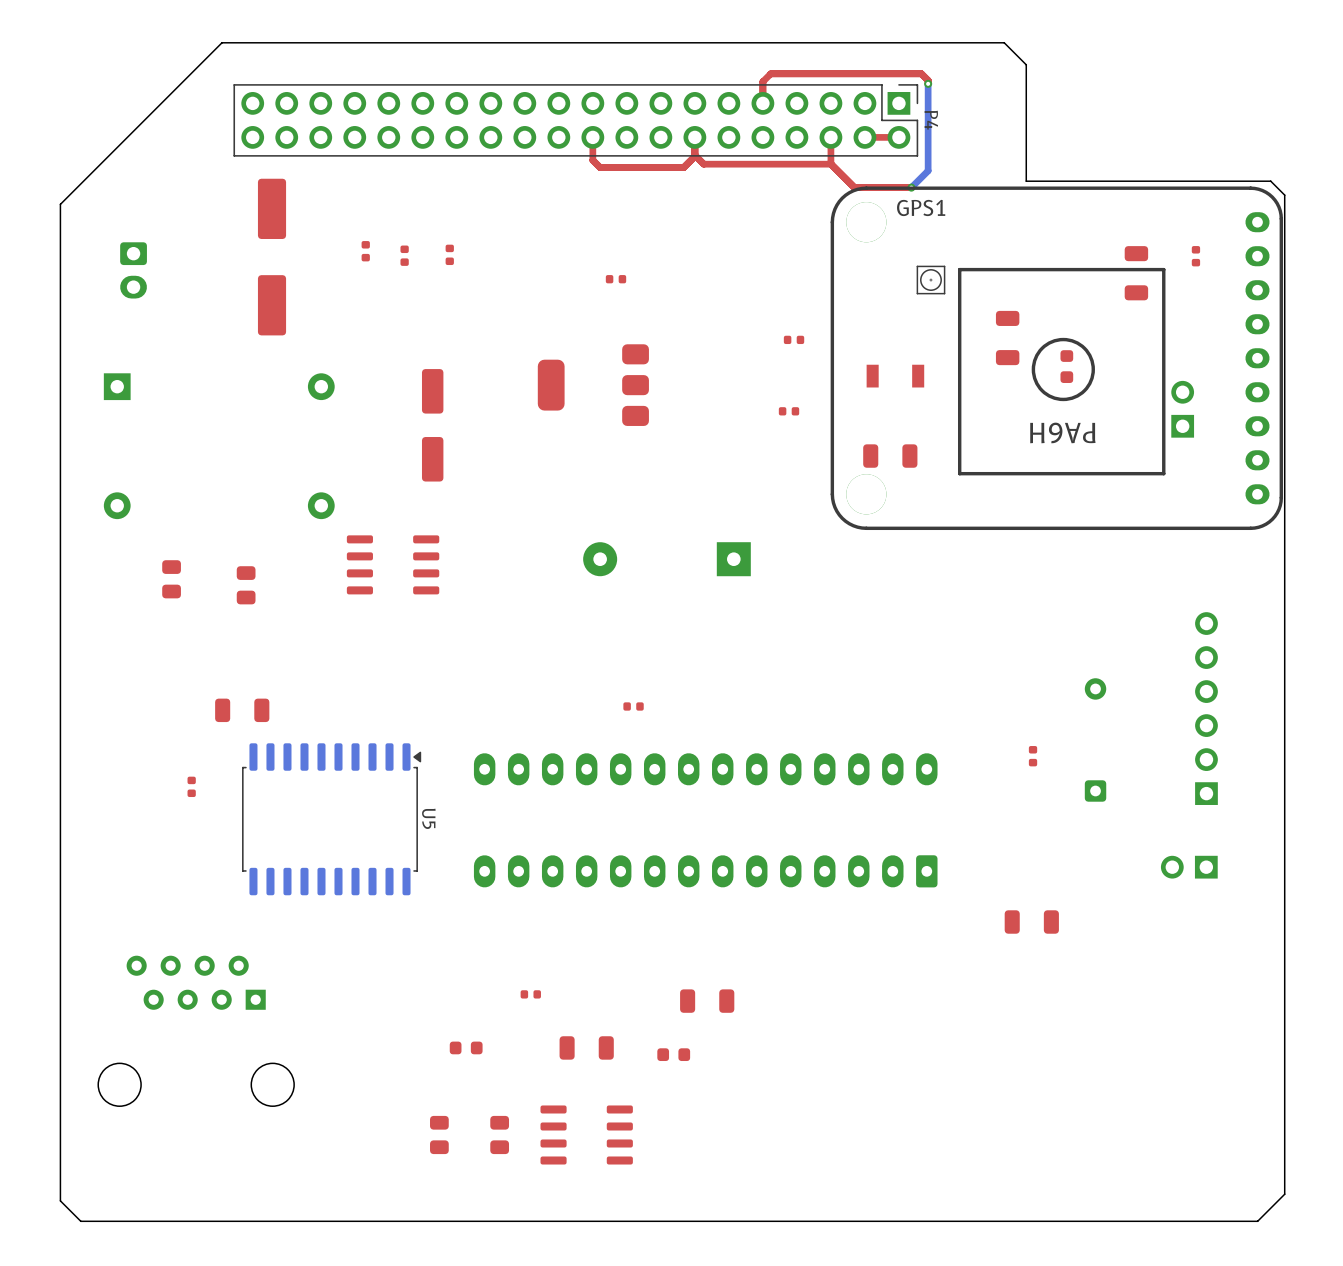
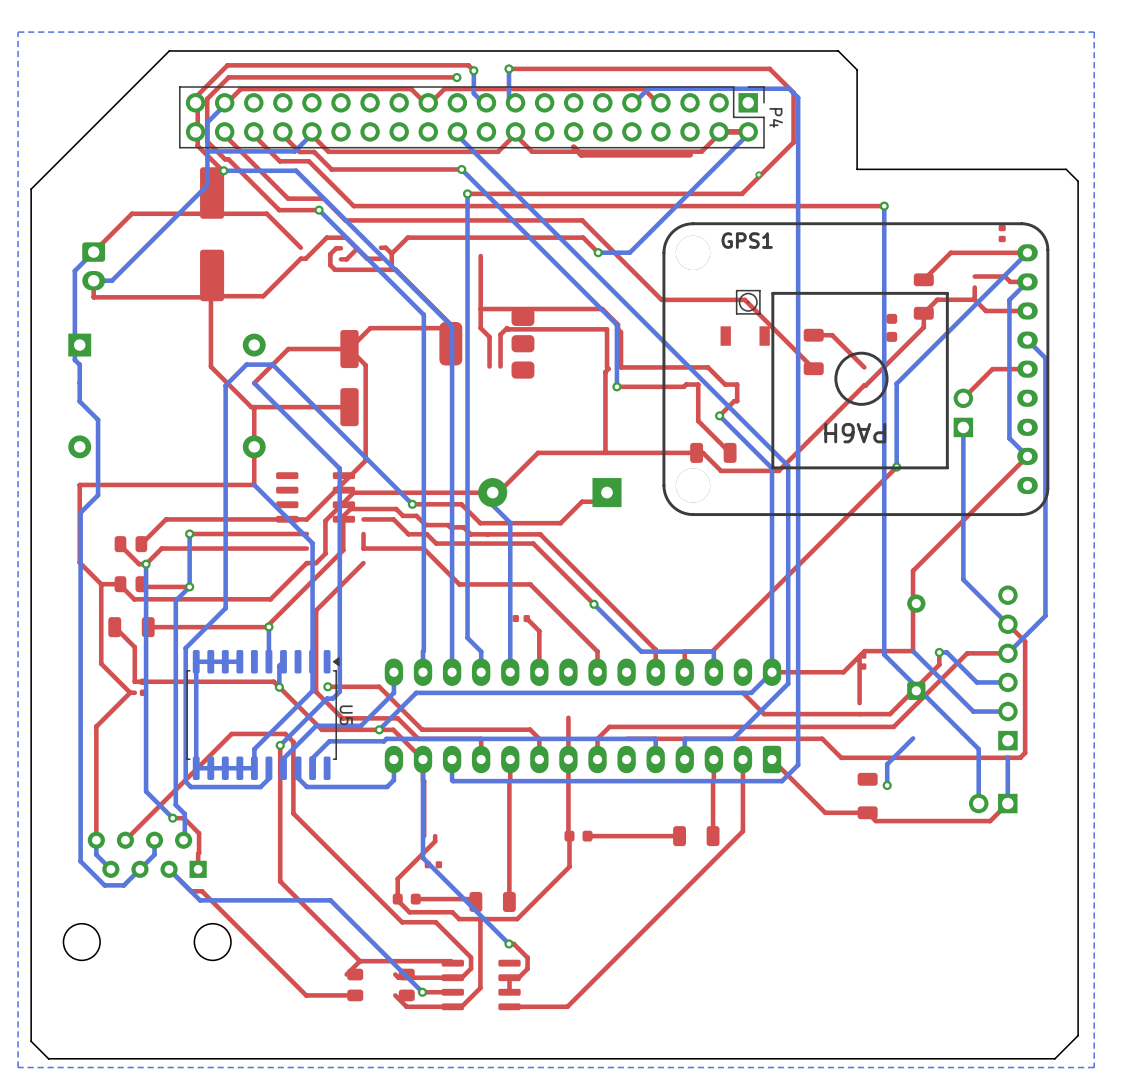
bottom zone outline: none -> (1094, 32) (18, 32) (18, 1067) (1094, 1067) (1094, 32)
top track: none -> (508, 68) (769, 68) (793, 92) (793, 142) (742, 193) (467, 193)
bottom track: none -> (508, 68) (508, 99) (515, 105)
via: none -> (508, 68)
top track: none -> (473, 70) (468, 65) (227, 65) (197, 95) (197, 145) (223, 170)
bottom track: none -> (473, 70) (473, 93) (485, 105)
via: none -> (473, 70)
top track: none -> (456, 77) (228, 77) (207, 98) (207, 141) (225, 159) (228, 159) (279, 210) (319, 210)
via: none -> (456, 77)
top track: (928, 83) (928, 80) (921, 73) (770, 73) (762, 81) (762, 103) -> none
bottom track: (928, 83) (928, 170) (911, 187) -> none
via: (928, 83) -> none
bottom track: none -> (224, 105) (207, 122) (207, 185) (112, 280) (93, 280)
bottom track: none -> (631, 105) (648, 88) (789, 88) (798, 97) (798, 764) (781, 781) (453, 781) (452, 759)
top track: none -> (660, 105) (643, 89) (444, 89) (427, 105) (411, 89) (240, 89) (224, 105)
top track: (694, 137) (694, 156) (683, 167) (600, 167) (592, 160) (592, 137) -> none
top track: (830, 137) (830, 164) (854, 187) (911, 187) -> none
top track: none -> (224, 134) (288, 198) (323, 198) (345, 220) (582, 220) (661, 299) (744, 299) (813, 368)
top track: none -> (253, 134) (279, 161) (308, 161) (353, 206) (884, 206)
top track: none -> (282, 134) (299, 151) (314, 151) (331, 169) (461, 169)
bottom track: none -> (311, 134) (294, 151) (207, 151)
bottom track: none -> (456, 134) (788, 466) (788, 683) (733, 738) (684, 738) (684, 759)
top track: none -> (718, 134) (701, 151) (532, 151) (515, 134) (498, 151) (328, 151) (311, 134)
bottom track: none -> (747, 134) (629, 252) (598, 252)
bottom track: none -> (461, 169) (616, 324) (616, 386)
via: none -> (461, 169)
bottom track: none -> (223, 170) (296, 170) (452, 326) (452, 672)
via: none -> (223, 170)
bottom track: none -> (467, 193) (467, 637) (481, 651) (481, 672)
via: none -> (467, 193)
bottom track: none -> (884, 206) (884, 654) (978, 749) (978, 803)
via: none -> (884, 206)
bottom track: none -> (319, 210) (423, 314) (423, 672)
via: none -> (319, 210)
part: (365, 251) -> none
part: (449, 254) -> none
part: (404, 255) -> none
part position: (133, 270) -> (93, 266)
top track: none -> (300, 247) (266, 213) (131, 213) (93, 252)
top track: none -> (380, 247) (385, 247) (391, 253)
top track: none -> (340, 248) (336, 248) (330, 254) (330, 265) (334, 269) (396, 269) (454, 328) (370, 328) (349, 349)
part: (1136, 273) -> none
top track: none -> (357, 248) (346, 259) (340, 259)
bottom track: none -> (93, 252) (74, 270) (74, 359) (79, 364) (79, 401) (98, 419) (98, 495) (80, 512) (80, 861) (104, 885) (123, 885) (154, 854) (154, 840)
top track: none -> (598, 252) (583, 237) (407, 237) (391, 253)
via: none -> (598, 252)
top track: none -> (1027, 252) (950, 252) (923, 279)
bottom track: none -> (1027, 252) (896, 383) (896, 467)
top track: none -> (391, 253) (391, 269)
part: (616, 279) -> none
top track: none -> (480, 256) (480, 328) (489, 336) (489, 366)
top track: none -> (380, 258) (367, 258) (346, 237) (326, 237) (305, 258) (300, 258) (263, 296) (210, 297)
top track: none -> (974, 276) (1004, 276) (1010, 281) (1027, 281)
top track: none -> (93, 280) (93, 297) (210, 297)
bottom track: none -> (1027, 281) (1009, 299) (1009, 438) (1027, 456)
top track: none -> (974, 287) (974, 299)
part: none -> (923, 296)
top track: none -> (210, 297) (210, 366) (251, 407) (349, 407)
top track: none -> (974, 299) (985, 310) (1027, 310)
top track: none -> (974, 299) (937, 299) (923, 313) (923, 327) (778, 470) (721, 470) (703, 452) (538, 452) (489, 501) (480, 492) (353, 492) (325, 520) (325, 553) (316, 563) (306, 563) (270, 599) (134, 599) (120, 584) (101, 584)
part: (1007, 338) -> none
part: (794, 339) -> none
top track: none -> (480, 309) (602, 309) (618, 324) (618, 329) (621, 332) (621, 367) (708, 367) (725, 384) (737, 384) (737, 401) (734, 401) (719, 415)
GPS1 position: (1056, 358) -> (855, 369)
top track: none -> (813, 335) (832, 335) (864, 367)
bottom track: none -> (1027, 340) (1045, 358) (1045, 615) (1007, 653)
top track: none -> (349, 349) (288, 349) (254, 383)
top track: none -> (349, 349) (365, 365) (365, 460) (306, 519) (166, 519) (141, 544)
part: none -> (813, 351)
part position: (1182, 409) -> (963, 412)
top track: none -> (500, 366) (500, 334) (507, 328) (607, 329) (608, 368) (605, 371) (605, 452)
part: (789, 411) -> none
top track: none -> (1027, 369) (992, 369) (963, 398)
bottom track: none -> (254, 383) (339, 468) (339, 691) (332, 698) (326, 698) (280, 745)
top track: none -> (616, 386) (683, 386) (686, 384) (698, 384) (698, 421) (730, 452)
via: none -> (616, 386)
part: (890, 456) -> none
top track: none -> (254, 407) (254, 484) (79, 484) (79, 562) (101, 584)
bottom track: none -> (719, 415) (772, 468) (772, 672) (751, 692) (416, 692) (379, 729)
via: none -> (719, 415)
bottom track: none -> (963, 427) (963, 579) (1007, 624)
part: none -> (713, 452)
top track: none -> (1027, 456) (913, 570) (913, 651) (864, 651) (843, 672) (772, 672)
top track: none -> (896, 467) (712, 651) (684, 651) (684, 672)
via: none -> (896, 467)
bottom track: none -> (254, 484) (312, 543) (312, 690) (254, 749) (254, 768) (196, 768) (196, 661) (239, 661)
bottom track: none -> (489, 501) (510, 522) (510, 672)
top track: none -> (603, 501) (582, 501) (560, 523) (480, 523) (461, 504) (412, 504)
bottom track: none -> (412, 504) (272, 364) (246, 364) (225, 385) (225, 608) (185, 648) (185, 781) (191, 787) (260, 787) (268, 778) (268, 768)
via: none -> (412, 504)
part: (171, 579) -> none
part: (246, 585) -> none
top track: none -> (363, 519) (393, 519) (408, 534) (426, 534) (436, 543) (533, 543) (594, 604)
bottom track: none -> (189, 533) (189, 586) (175, 600) (175, 804) (184, 813) (183, 840)
via: none -> (189, 533)
top track: none -> (306, 533) (189, 533)
top track: none -> (363, 533) (363, 548) (423, 548) (459, 584) (530, 584) (597, 651) (597, 672)
top track: none -> (120, 544) (139, 564) (146, 564) (161, 548) (306, 548)
part: none -> (130, 544)
top track: none -> (363, 563) (316, 610) (316, 691) (342, 718) (397, 718) (418, 738) (481, 738) (481, 759)
bottom track: none -> (146, 564) (146, 791) (172, 818)
via: none -> (146, 564)
top track: none -> (101, 584) (101, 663) (130, 692)
part: none -> (130, 584)
top track: none -> (141, 584) (144, 586) (189, 586)
via: none -> (189, 586)
bottom track: none -> (594, 604) (641, 651) (713, 651) (713, 672)
via: none -> (594, 604)
top track: none -> (526, 618) (539, 631) (539, 672)
part position: (1206, 708) -> (1007, 667)
part position: (242, 710) -> (131, 627)
top track: none -> (1007, 624) (1025, 641) (1025, 752) (1020, 757) (841, 757) (822, 738) (626, 738)
top track: none -> (267, 625) (148, 627)
top track: none -> (267, 625) (343, 550) (343, 516) (350, 509) (396, 509) (403, 515) (416, 515) (425, 525) (463, 527) (470, 534) (540, 534) (655, 649) (655, 672)
top track: none -> (114, 627) (134, 647) (134, 681) (273, 681) (321, 729) (393, 729) (423, 759) (424, 836)
bottom track: none -> (268, 626) (268, 661)
via: none -> (268, 626)
bottom track: none -> (913, 651) (973, 711) (1007, 711)
top track: none -> (939, 652) (939, 664) (890, 714) (764, 714) (742, 692)
bottom track: none -> (939, 652) (946, 652) (976, 682) (1007, 682)
via: none -> (939, 652)
top track: none -> (1007, 653) (967, 653) (893, 726) (609, 726) (597, 738) (597, 759)
top track: none -> (859, 656) (859, 703)
bottom track: none -> (283, 661) (279, 665) (279, 687)
bottom track: none -> (393, 672) (393, 692) (360, 725) (316, 725) (283, 758) (283, 768)
via: none -> (279, 687)
top track: none -> (327, 686) (379, 686) (422, 729) (530, 729) (539, 738) (539, 759)
via: none -> (327, 686)
top track: none -> (130, 692) (96, 726) (96, 840)
top track: none -> (134, 692) (130, 692)
top track: none -> (568, 717) (569, 866) (517, 919) (459, 919) (452, 912) (409, 912) (397, 900) (397, 878) (435, 841) (435, 836)
via: none -> (379, 729)
bottom track: none -> (913, 738) (887, 764) (887, 785)
top track: none -> (280, 745) (280, 881) (359, 961)
via: none -> (280, 745)
part position: (1189, 867) -> (993, 803)
bottom track: none -> (1007, 757) (1007, 803)
bottom track: none -> (393, 759) (393, 780) (387, 786) (306, 786) (298, 778) (298, 768)
bottom track: none -> (423, 759) (423, 857) (508, 943)
top track: none -> (510, 759) (509, 901)
bottom track: none -> (655, 759) (655, 738) (386, 738) (384, 741) (329, 741) (312, 758) (312, 768)
top track: none -> (713, 759) (713, 836)
top track: none -> (742, 759) (742, 831) (567, 1006) (509, 1006)
top track: none -> (772, 759) (825, 812) (867, 812) (875, 821) (990, 821) (1007, 803)
via: none -> (887, 785)
part rotation: 0° (1031, 922) -> 90° clockwise (867, 796)
top track: none -> (172, 818) (183, 818) (199, 833) (198, 869)
via: none -> (172, 818)
part: none -> (578, 836)
top track: none -> (679, 836) (587, 836)
part: none -> (696, 836)
bottom track: none -> (96, 840) (96, 854) (110, 869)
top track: none -> (125, 840) (231, 733) (285, 733) (293, 741) (293, 813) (402, 922) (435, 922) (471, 957) (471, 968) (461, 977) (398, 977) (395, 974)
top track: none -> (169, 869) (190, 891) (202, 891) (306, 995) (346, 995)
bottom track: none -> (169, 869) (200, 900) (330, 900) (422, 992)
part: (707, 1001) -> none
top track: none -> (415, 899) (473, 899) (475, 901)
part position: (466, 1047) -> (406, 899)
part position: (586, 1047) -> (492, 901)
part: (673, 1054) -> none
top track: none -> (480, 919) (480, 988) (461, 1006) (406, 1006) (395, 995)
top track: none -> (508, 943) (513, 943) (527, 957) (527, 968) (518, 977) (509, 977) (509, 992)
via: none -> (508, 943)
top track: none -> (359, 961) (346, 974)
top track: none -> (359, 961) (450, 961) (452, 963)
via: none -> (422, 992)
top track: none -> (452, 992) (422, 992)

